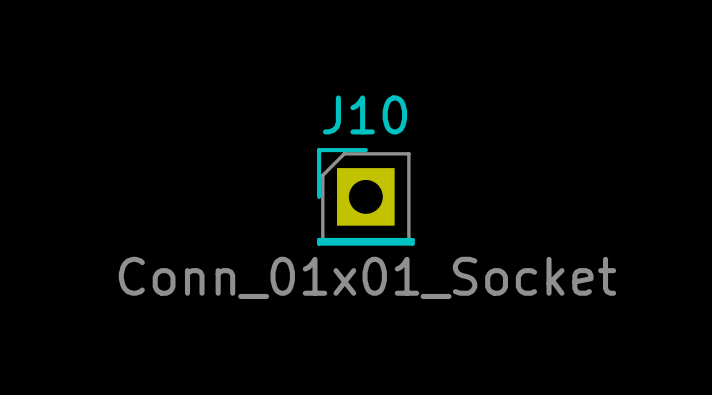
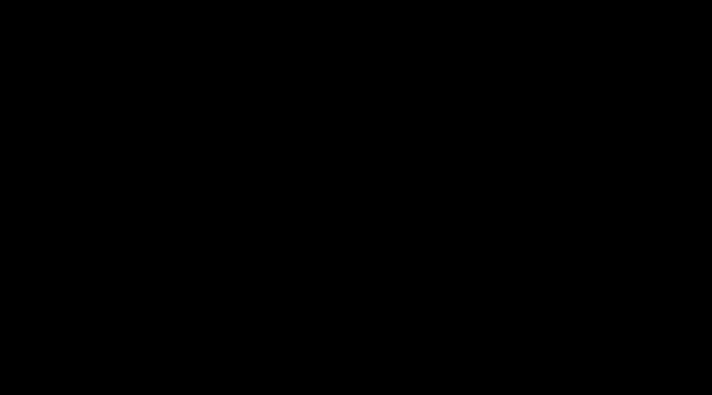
J10: Conn_01x01_Socket (365, 196) -> none

